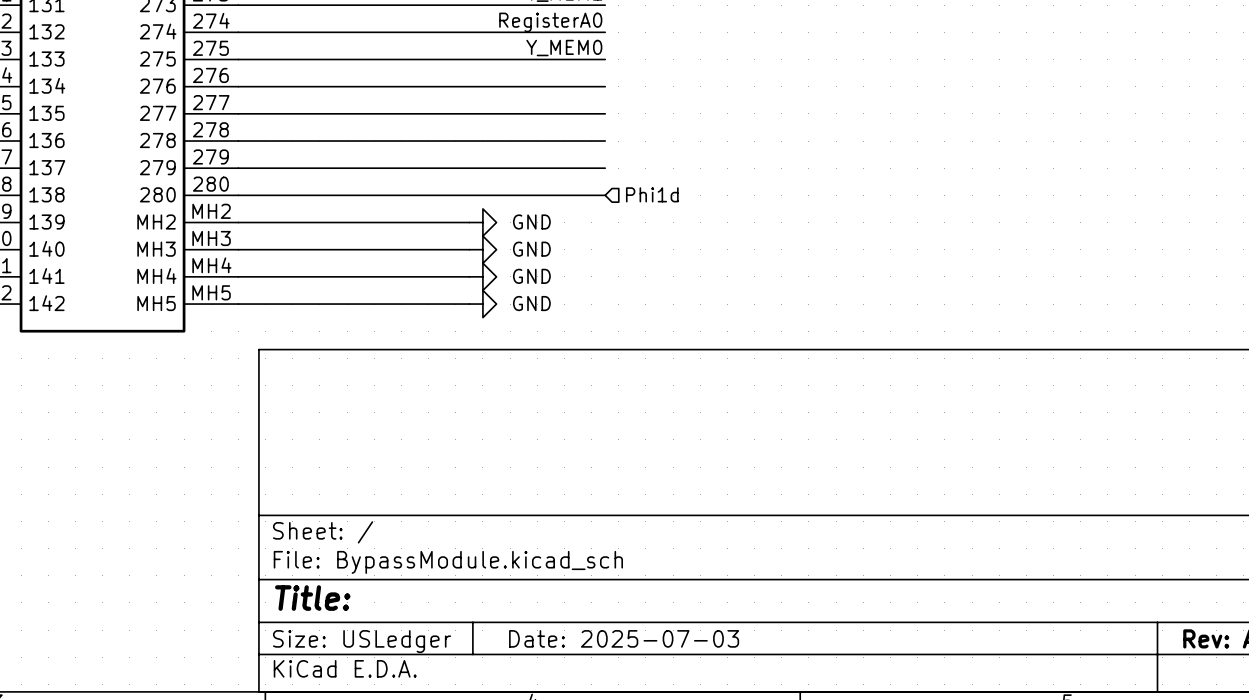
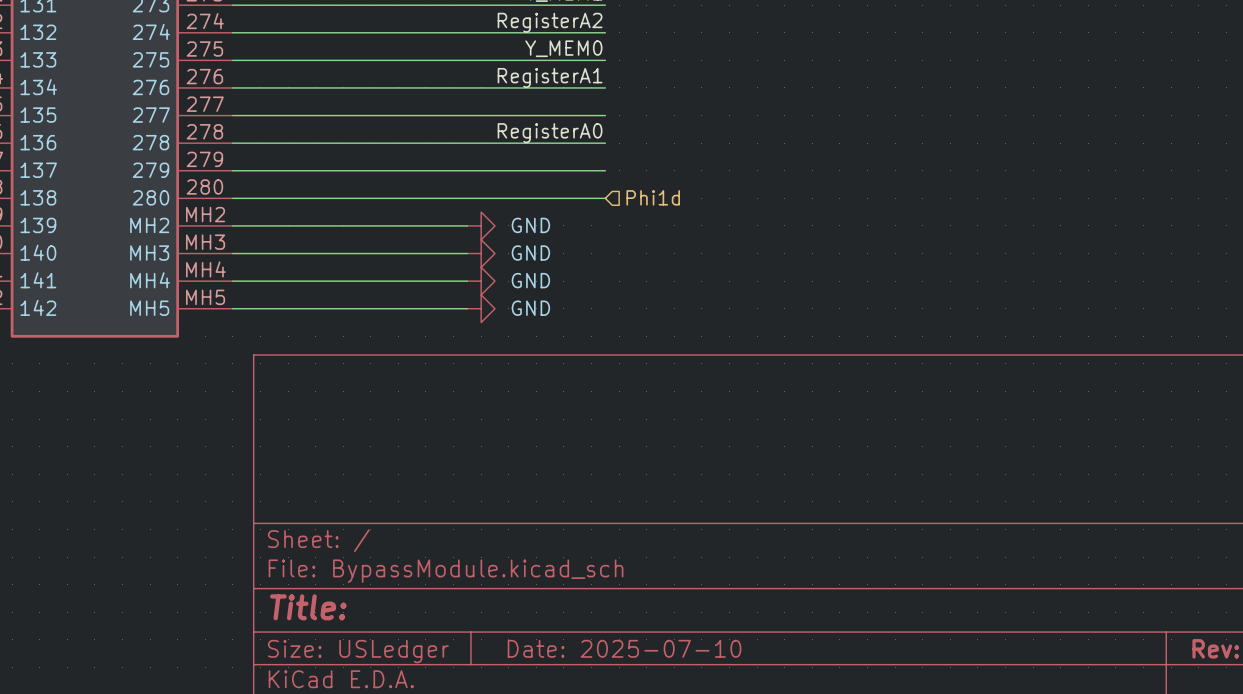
label: RegisterA0 (550, 22) -> RegisterA2 (550, 22)
label: none -> RegisterA1 (550, 77)
label: none -> RegisterA0 (550, 133)
title block: Date: 2025-07-03 (624, 638) -> Date: 2025-07-10 (624, 648)

